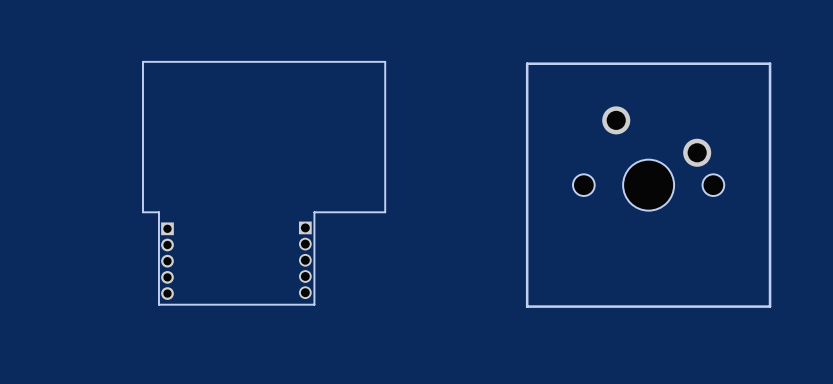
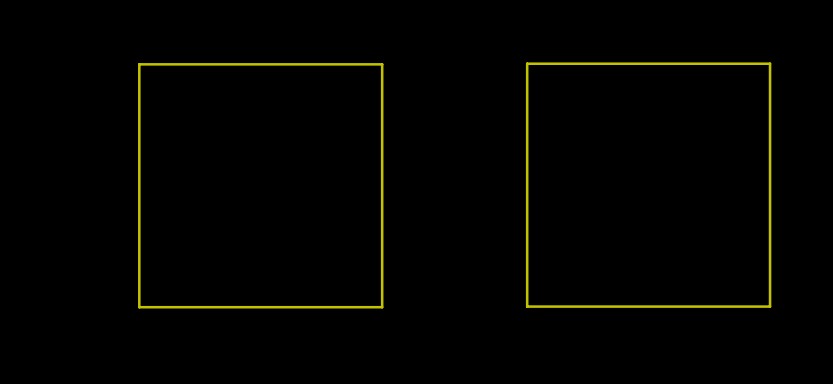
board edge: (385, 61) (385, 212) (314, 212) (314, 304) (158, 304) (158, 212) (142, 212) (142, 61) (385, 61) -> (382, 64) (382, 307) (139, 307) (139, 64) (382, 64)
part: (648, 158) -> none
part: (305, 260) -> none
part: (167, 261) -> none

